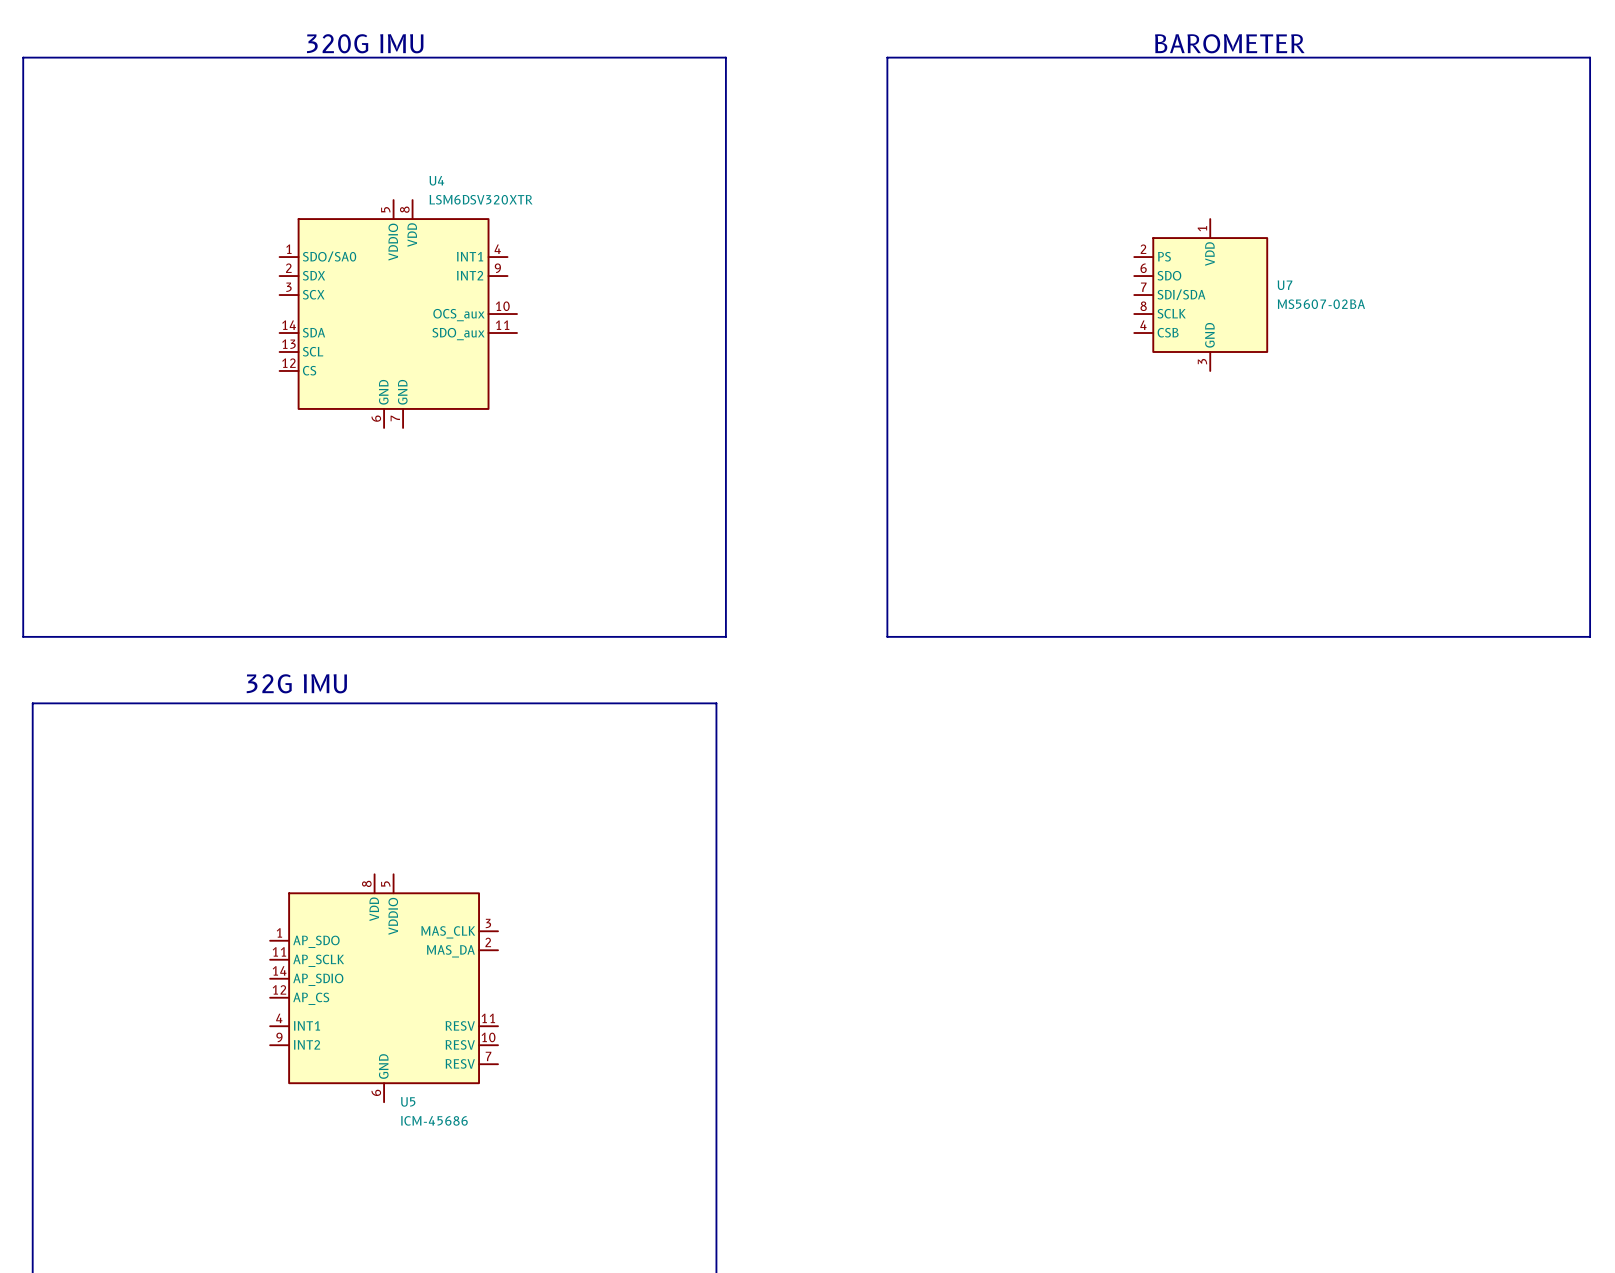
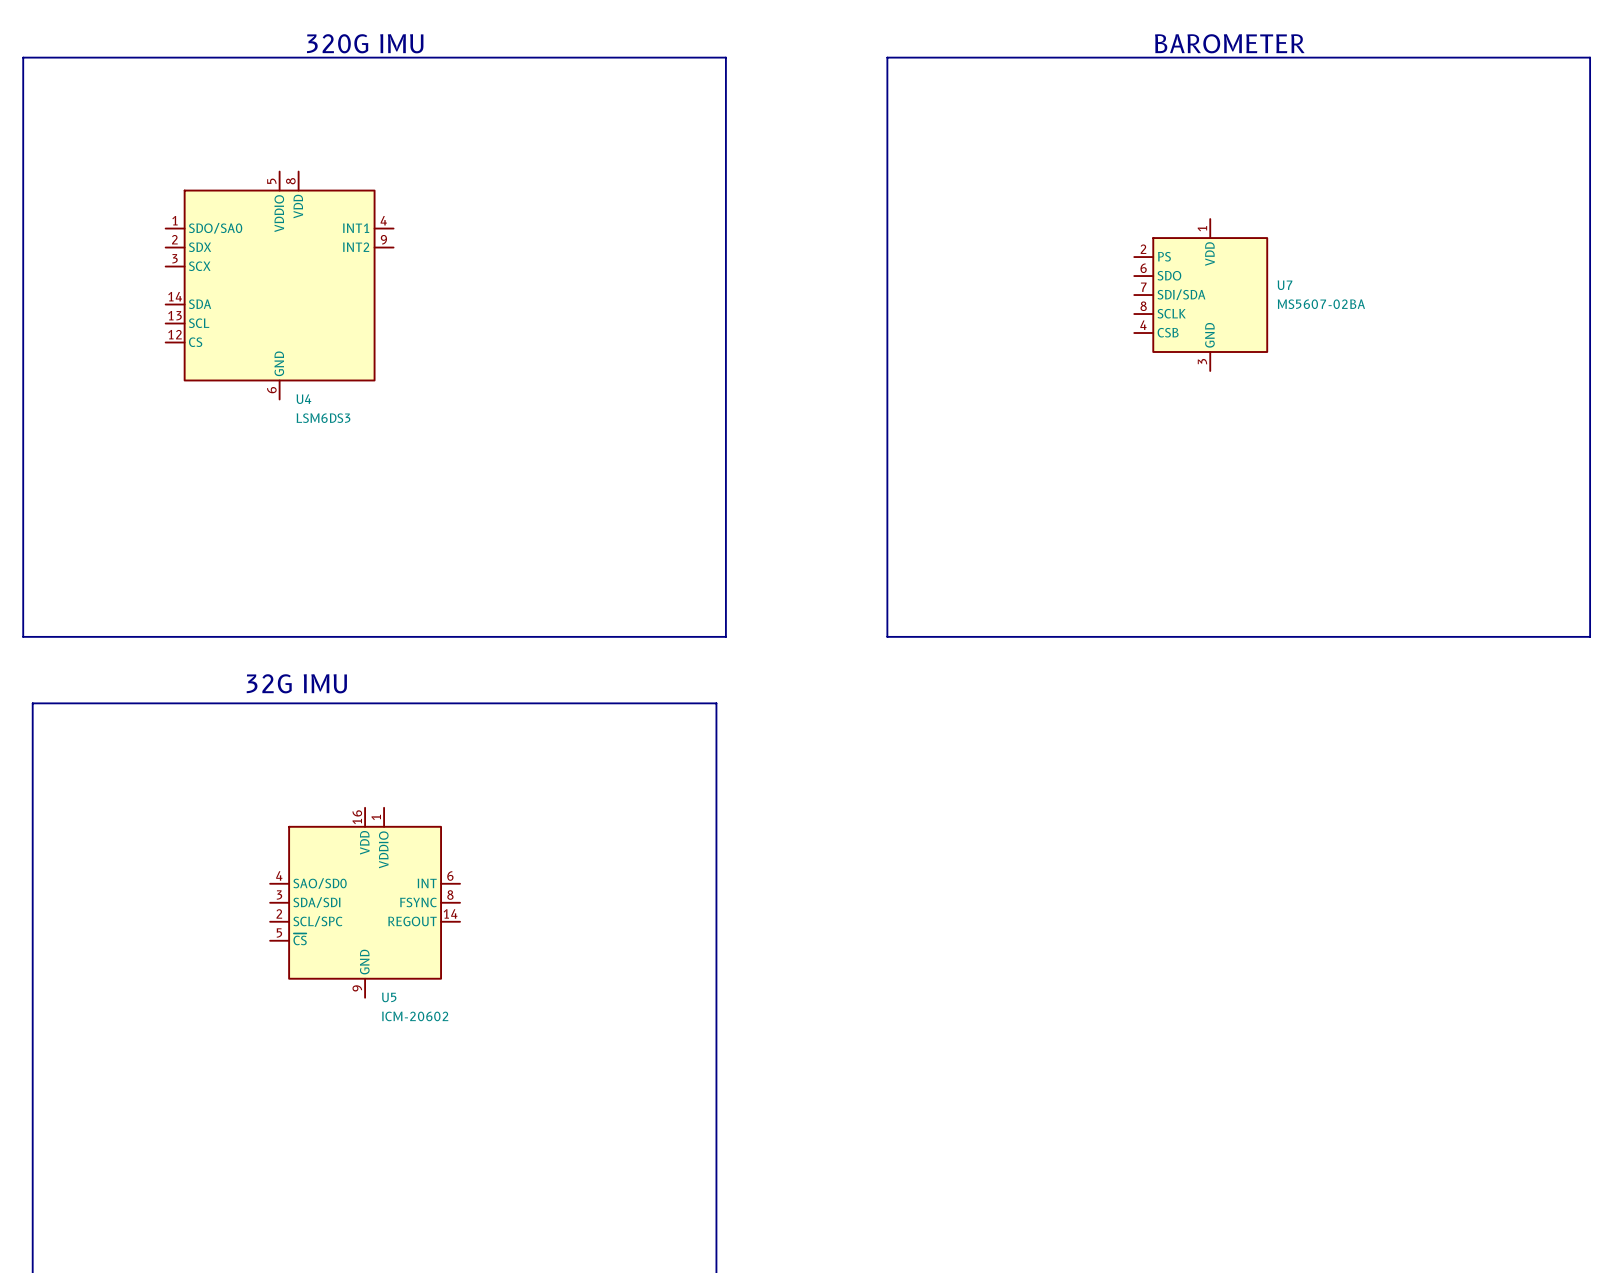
U4 name position: U4 (436, 180) -> U4 (303, 399)
U4 value: LSM6DSV320XTR (481, 199) -> LSM6DS3 (323, 418)
U4 symbol: [279, 200, 518, 428] -> [165, 171, 394, 400]
U5 symbol: [270, 874, 499, 1103] -> [270, 807, 461, 998]
U5 name position: U5 (408, 1101) -> U5 (389, 997)
U5 value: ICM-45686 (434, 1120) -> ICM-20602 (415, 1016)

